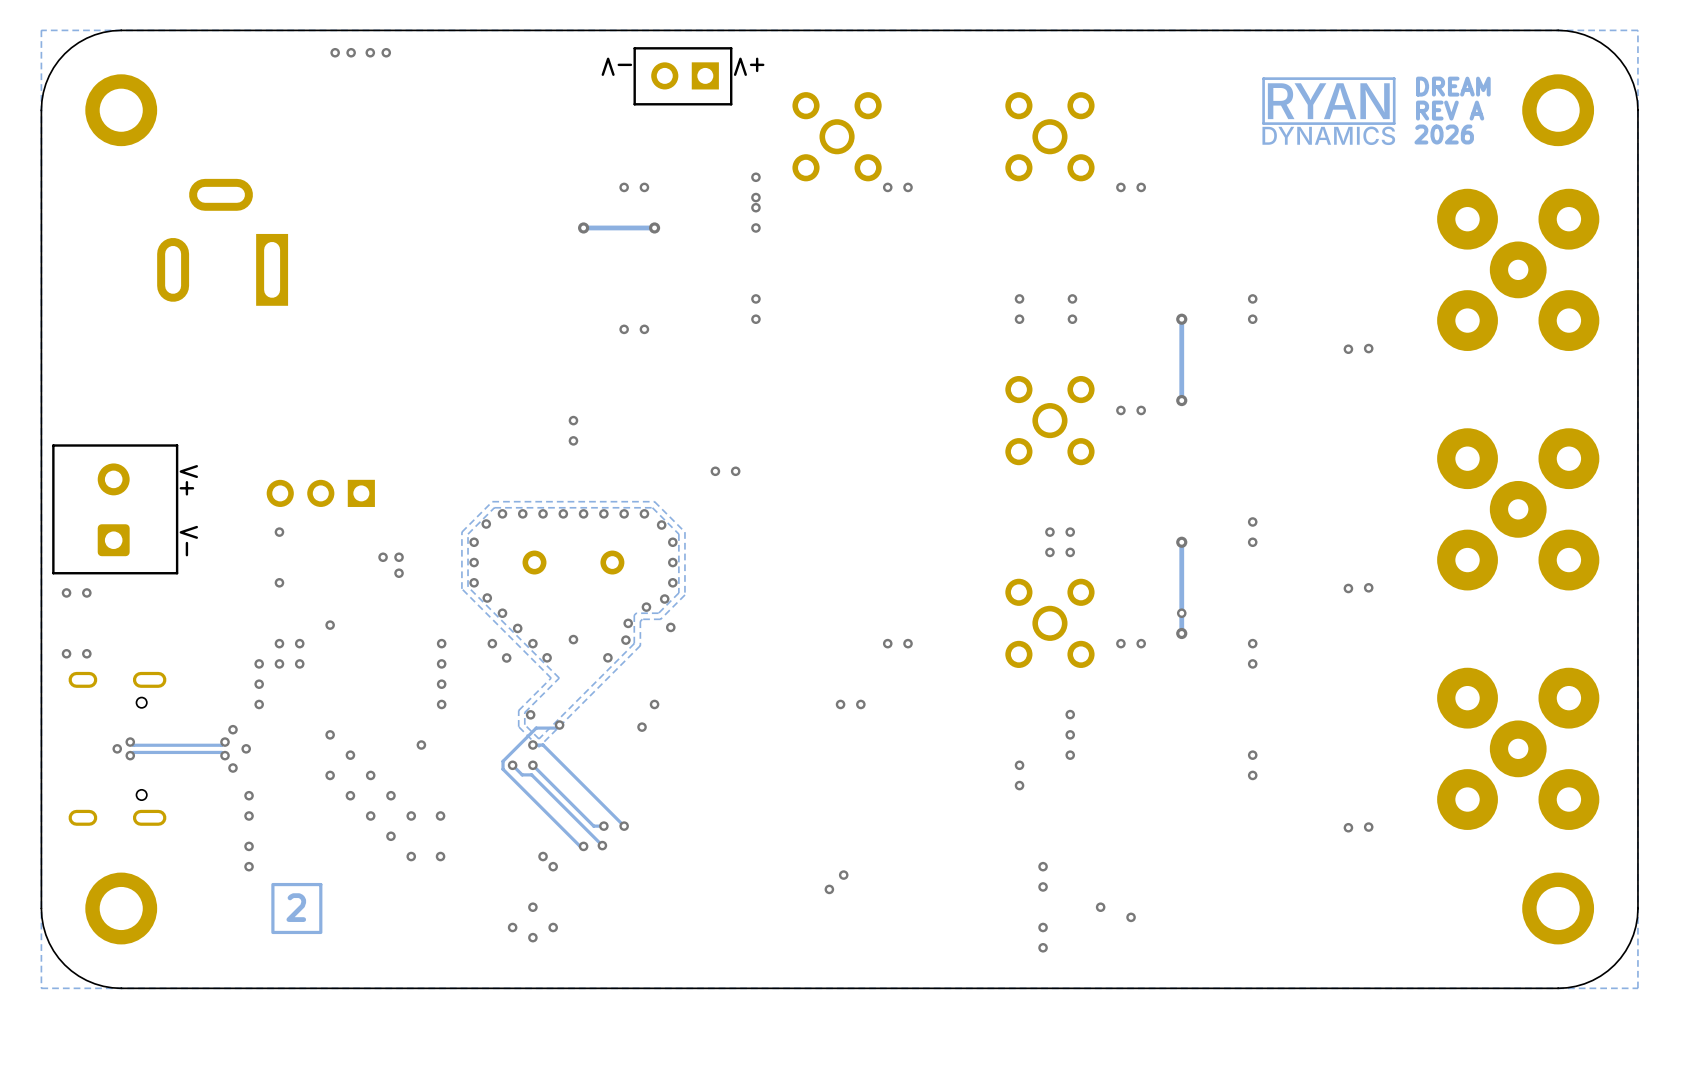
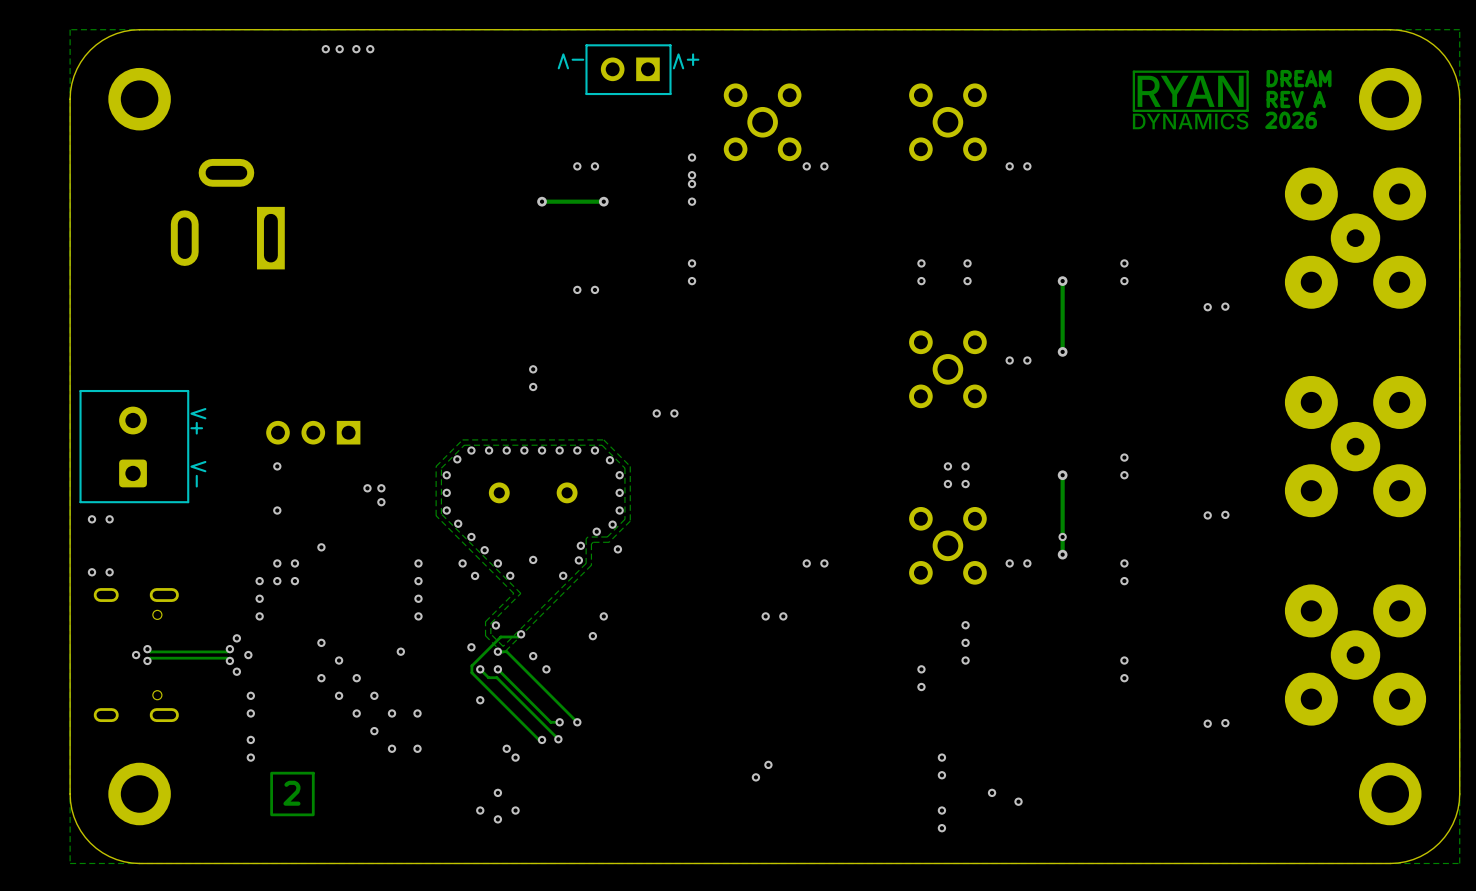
via: none -> (471, 647)
via: none -> (533, 656)
via: none -> (546, 669)
via: none -> (480, 700)

